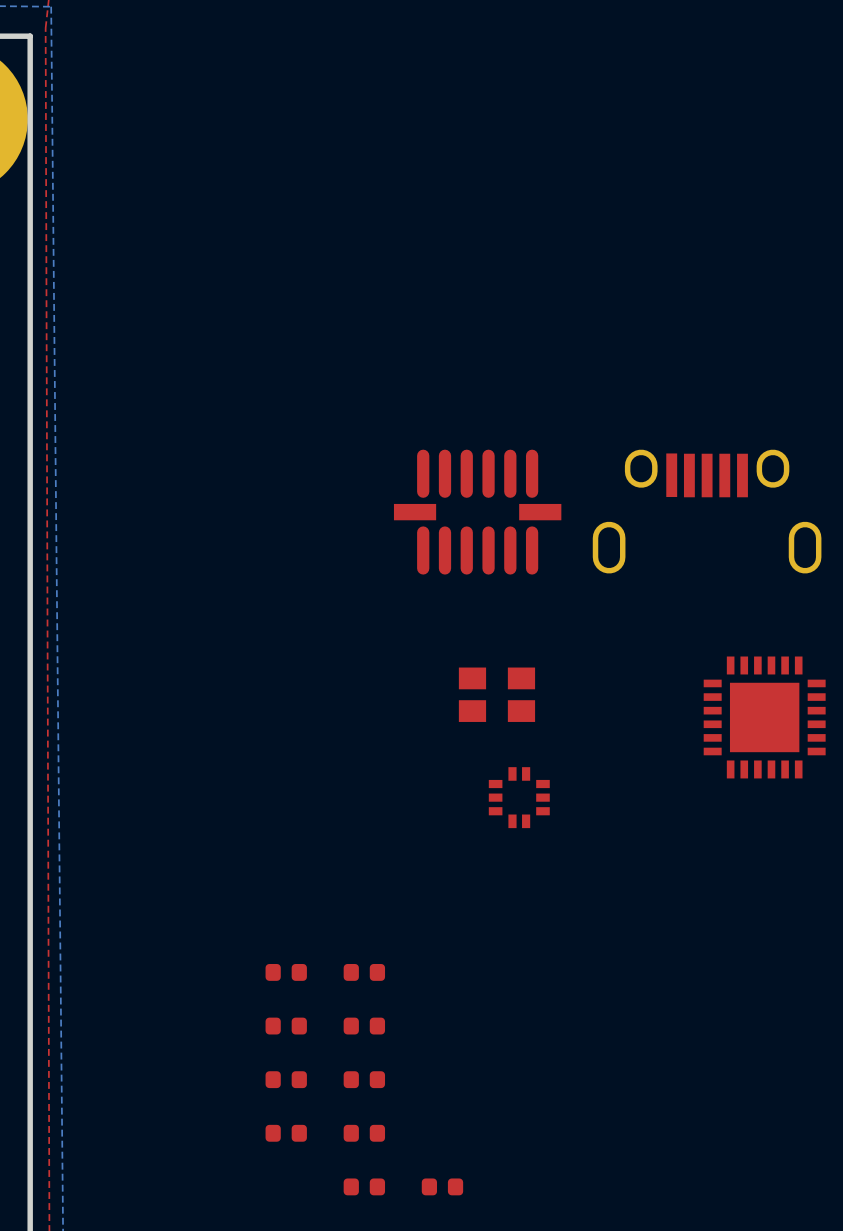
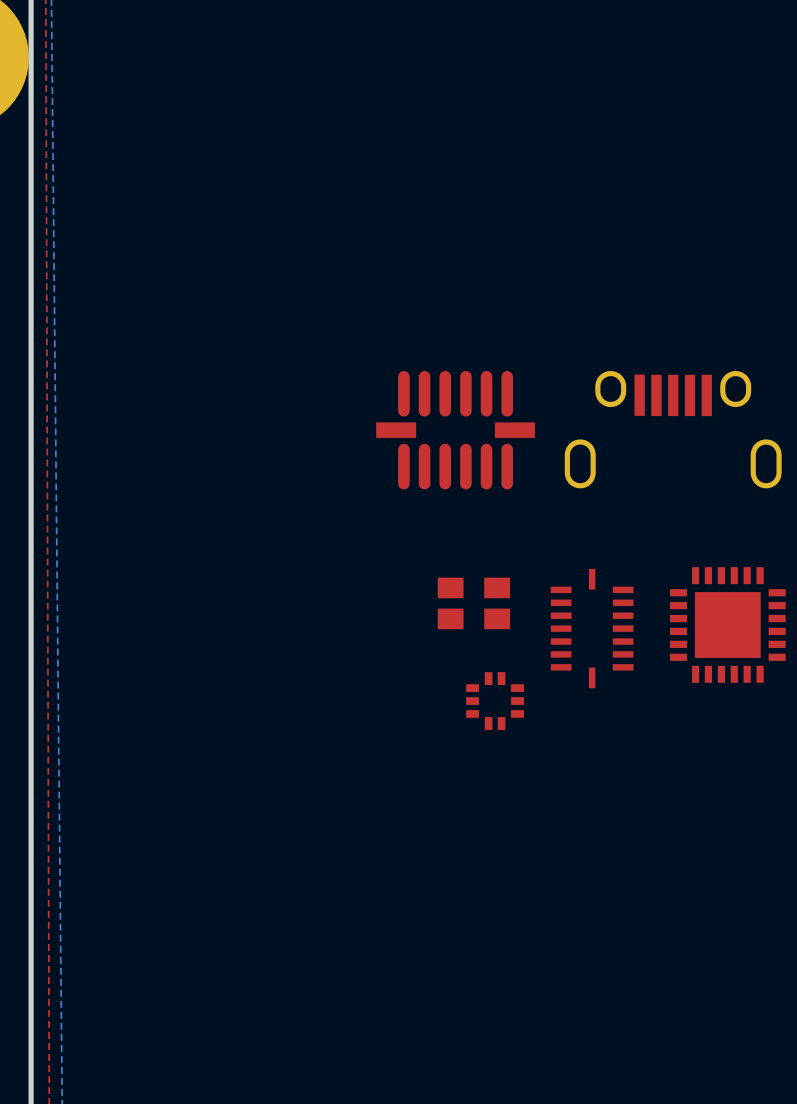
part: none -> (592, 628)
part: (286, 972) -> none
part: (364, 972) -> none
part: (286, 1026) -> none
part: (364, 1026) -> none
part: (286, 1079) -> none
part: (364, 1079) -> none
part: (286, 1133) -> none
part: (364, 1133) -> none
part: (364, 1186) -> none
part: (442, 1186) -> none

